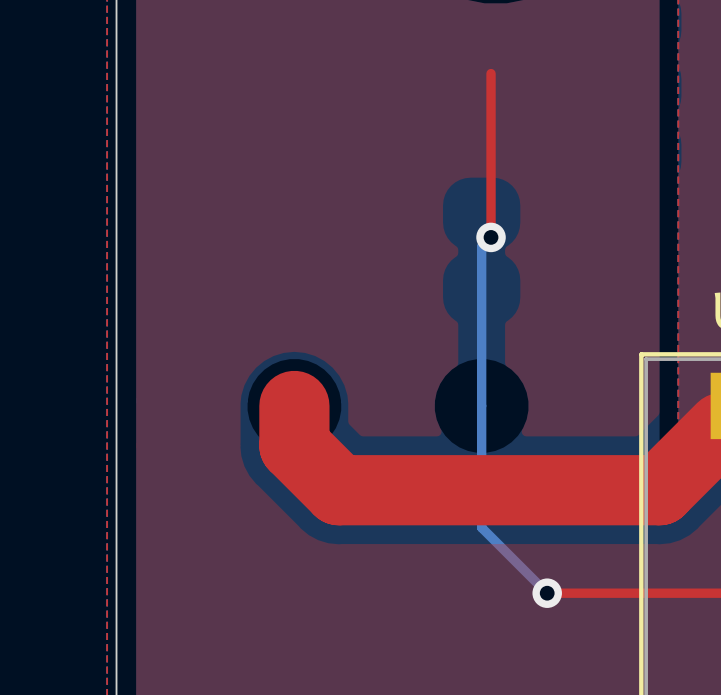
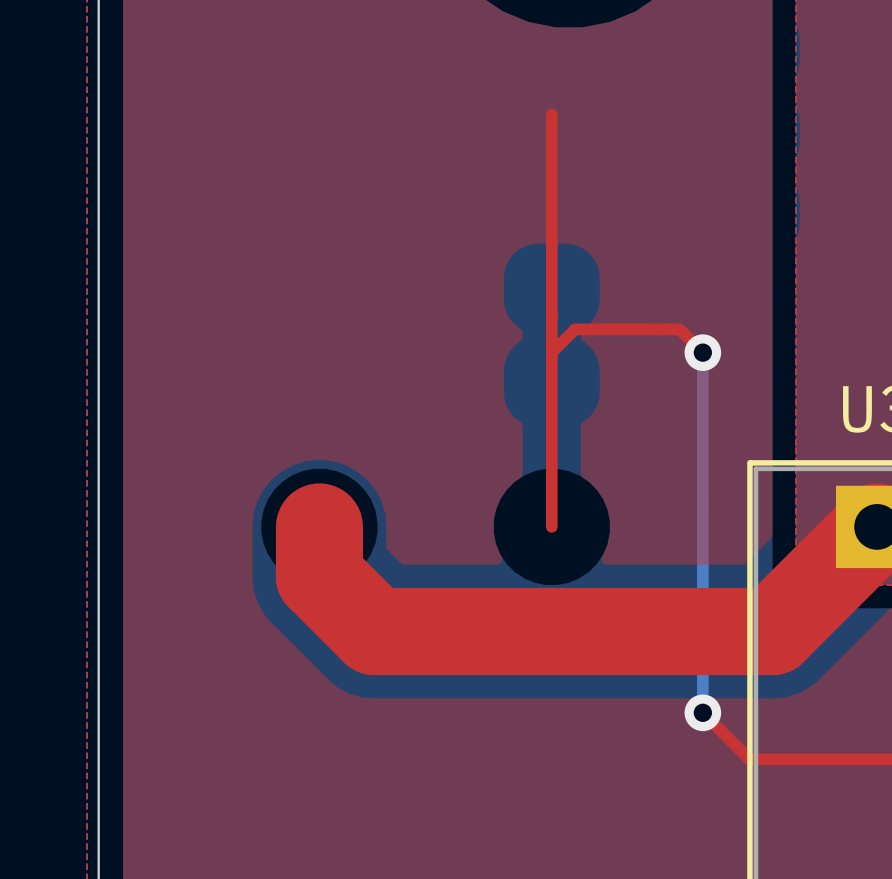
top track: none -> (551, 114) (551, 526)
top track: (491, 73) (491, 237) -> none
bottom track: (491, 237) (481, 246) (481, 527) (547, 593) -> none
via position: (491, 237) -> (702, 352)
top track: none -> (551, 352) (575, 329) (679, 329) (702, 352)
bottom track: none -> (702, 352) (702, 712)
top track: (547, 593) (640, 593) -> (702, 712) (749, 759)
via position: (547, 593) -> (702, 712)

